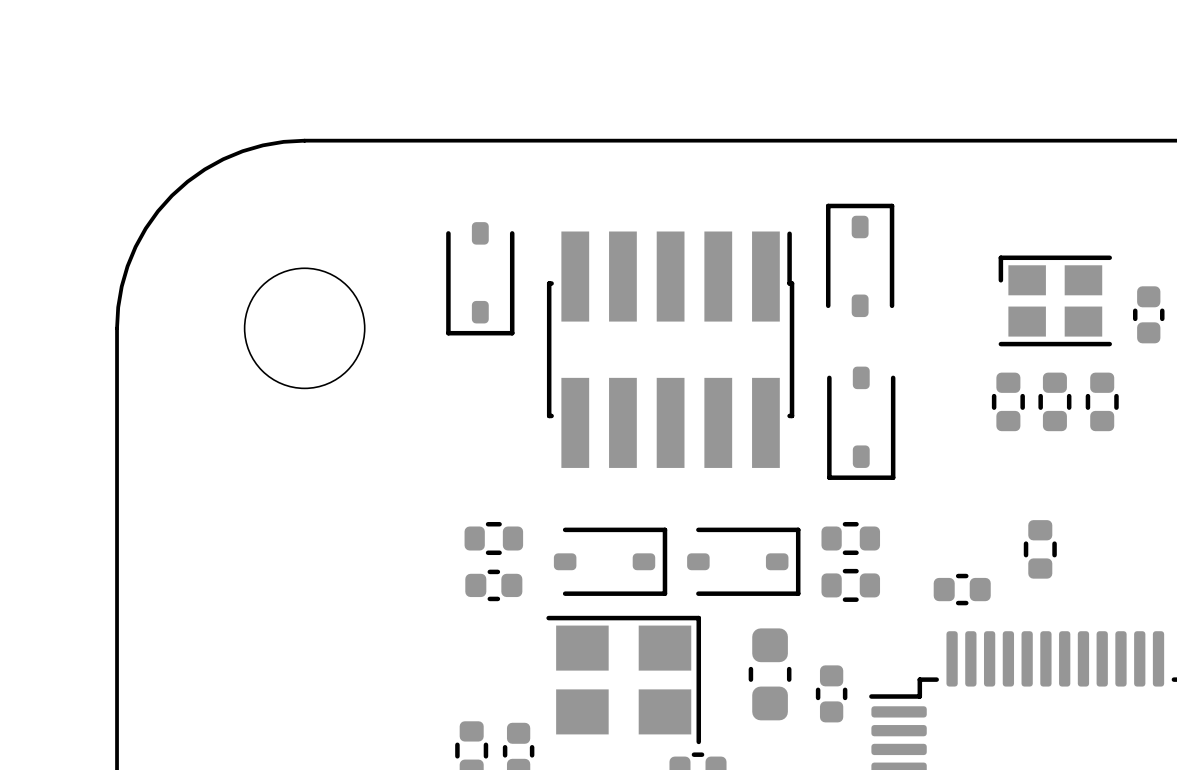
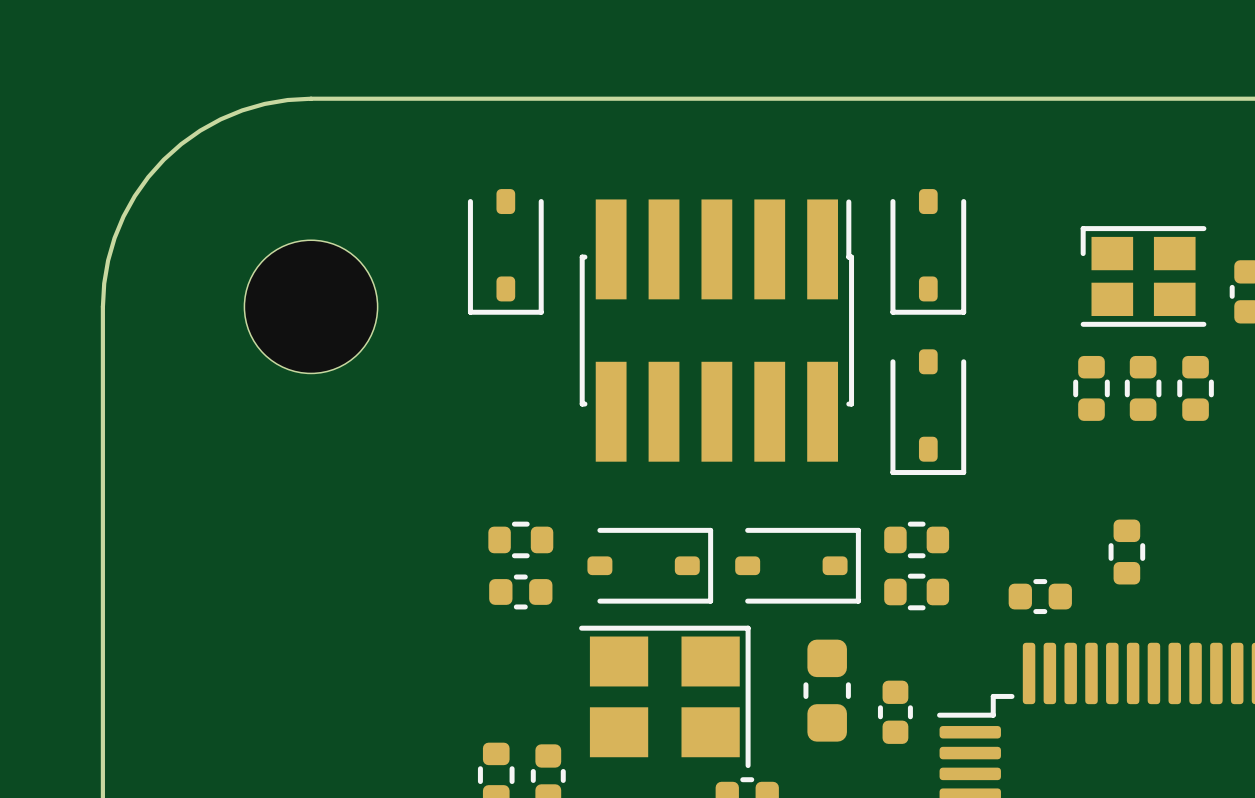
part rotation: 0° (860, 260) -> 180° (928, 251)

